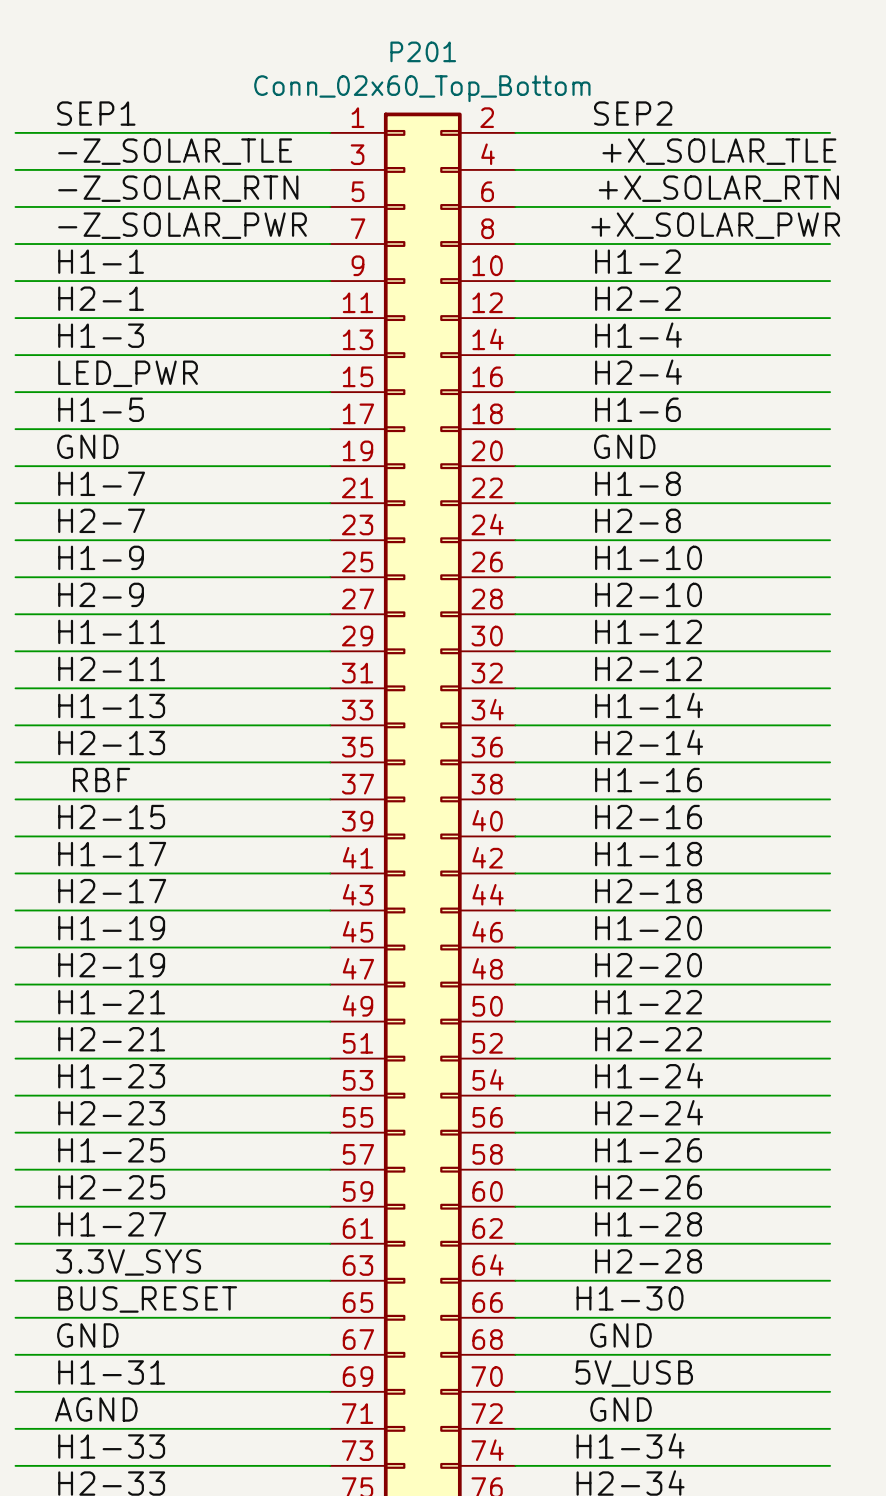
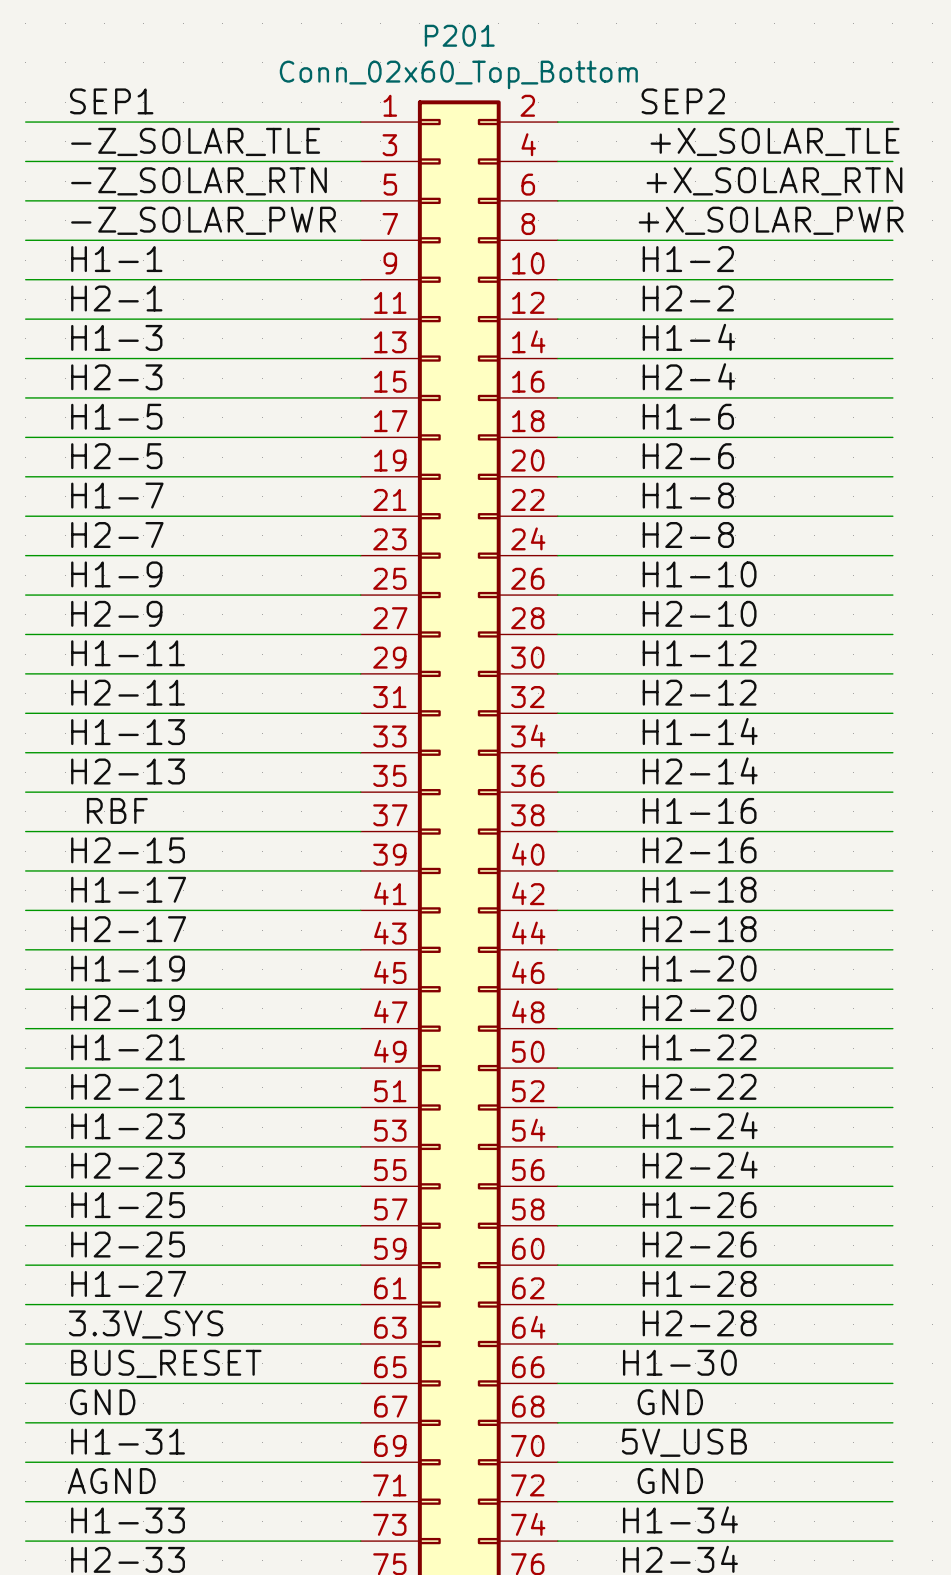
label: LED_PWR (128, 373) -> H2-3 (116, 377)
label: GND (87, 446) -> H2-5 (116, 456)
label: GND (624, 446) -> H2-6 (688, 456)

